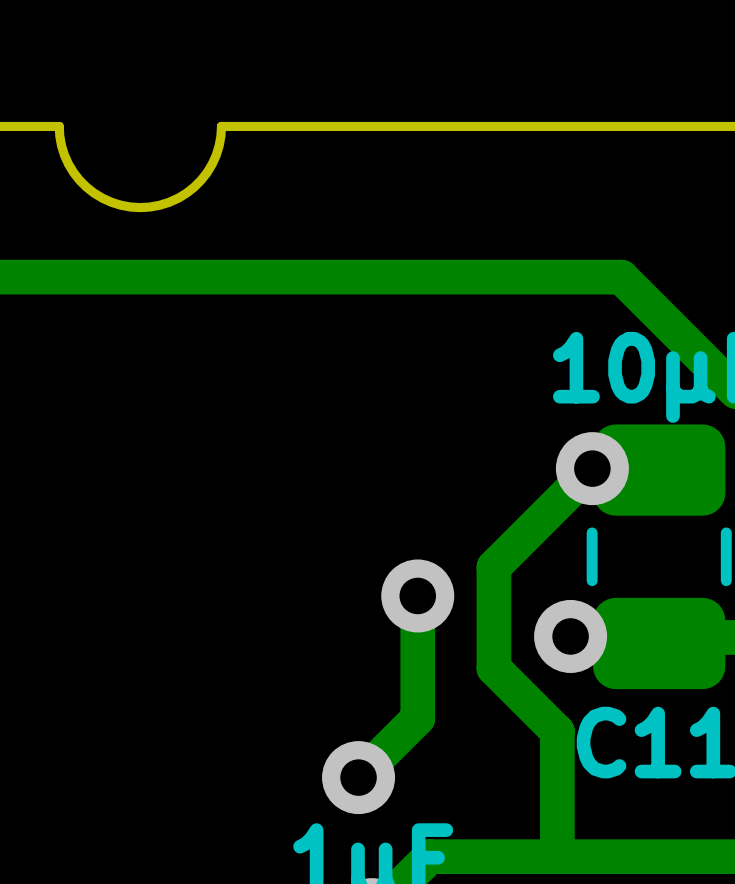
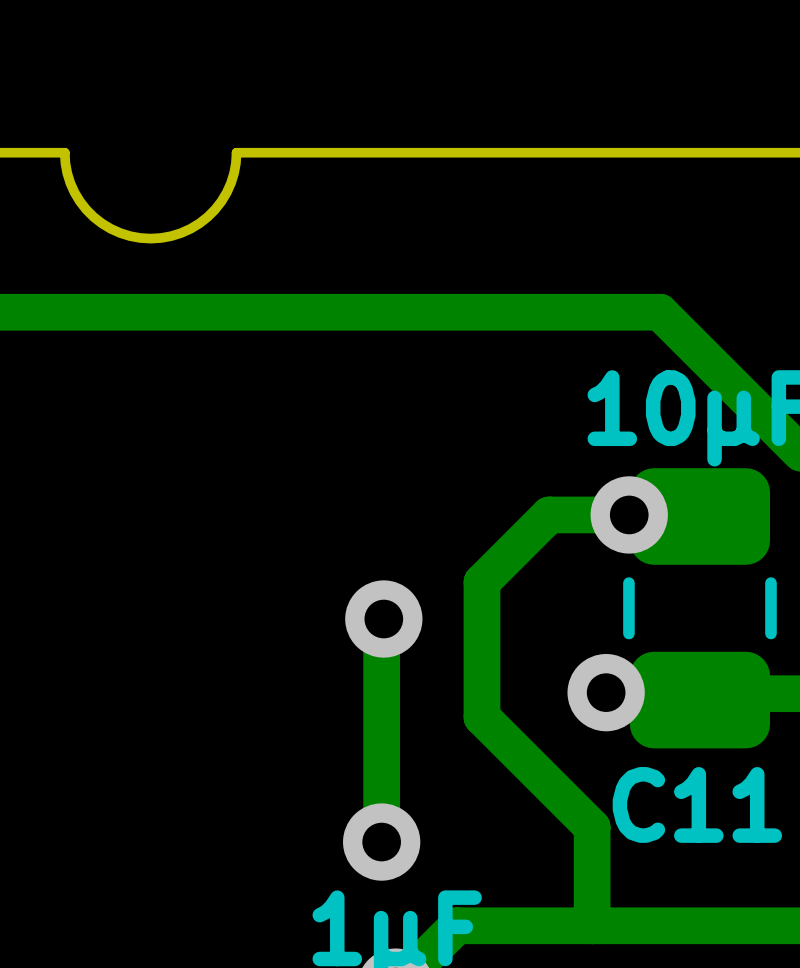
track: (592, 468) (493, 567) (493, 668) (557, 731) (557, 763) -> (629, 514) (549, 514) (481, 582) (481, 717) (592, 827)
track: (417, 595) (417, 718) (358, 777) -> (383, 619) (381, 621) (381, 842)
via position: (417, 595) -> (383, 619)

